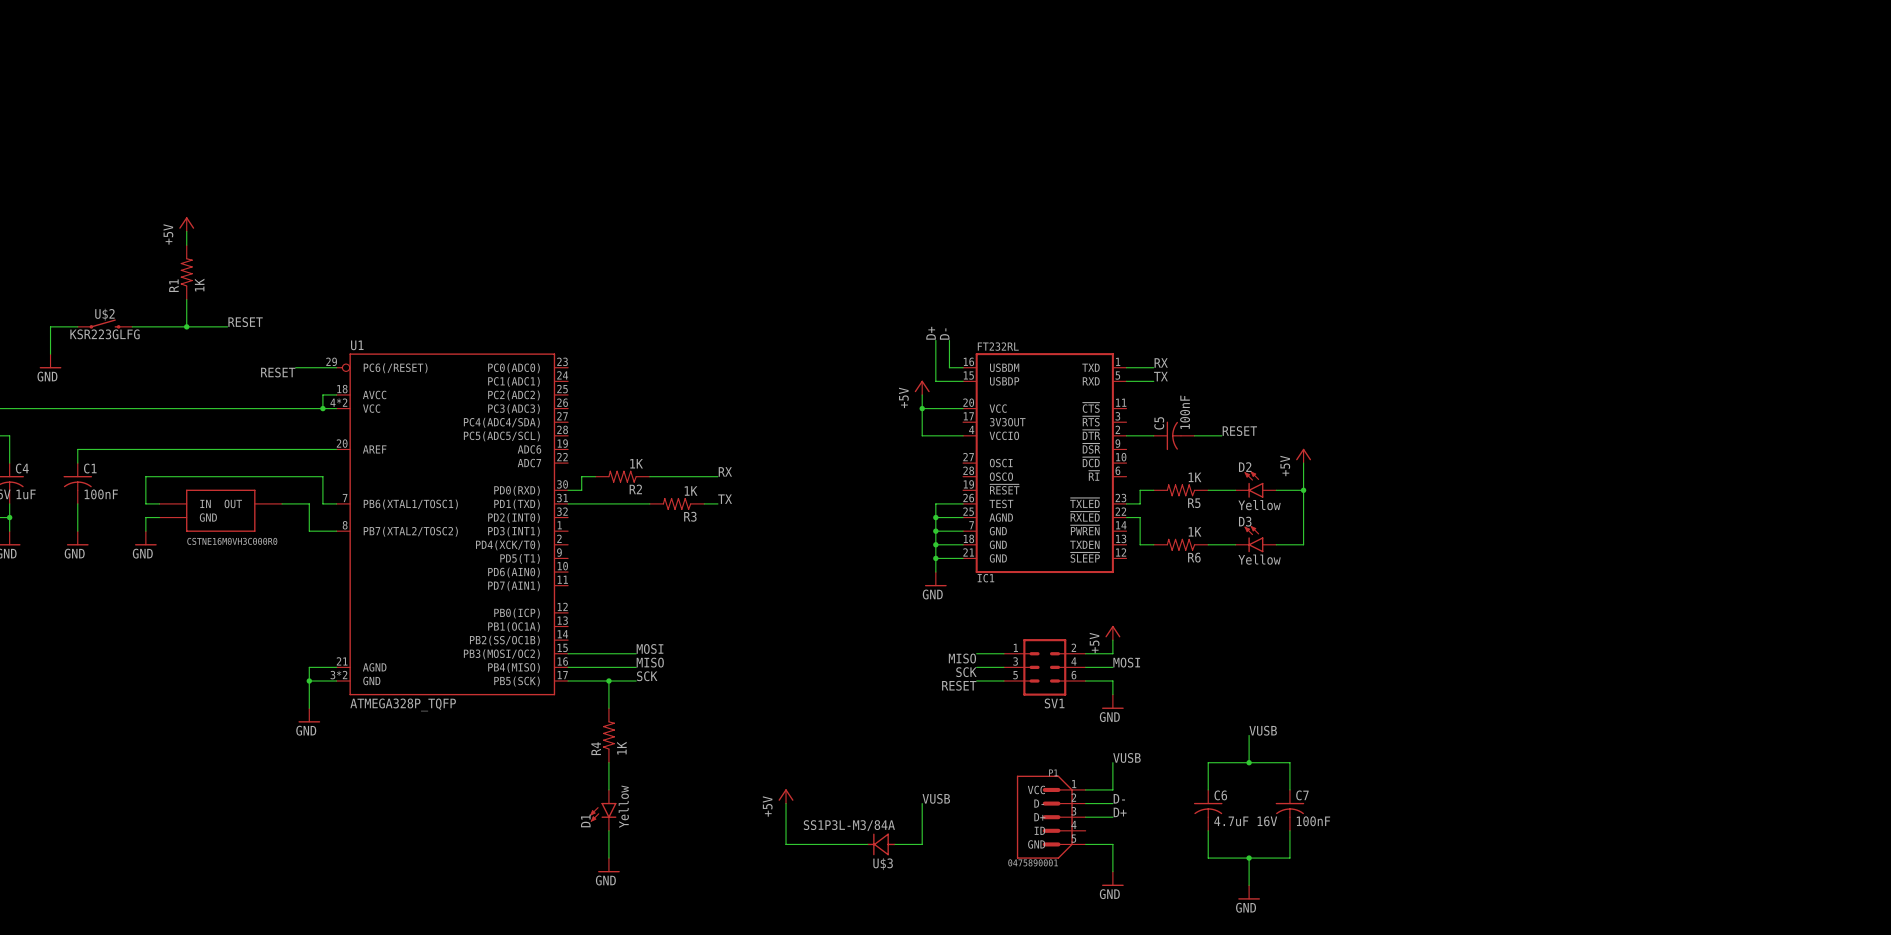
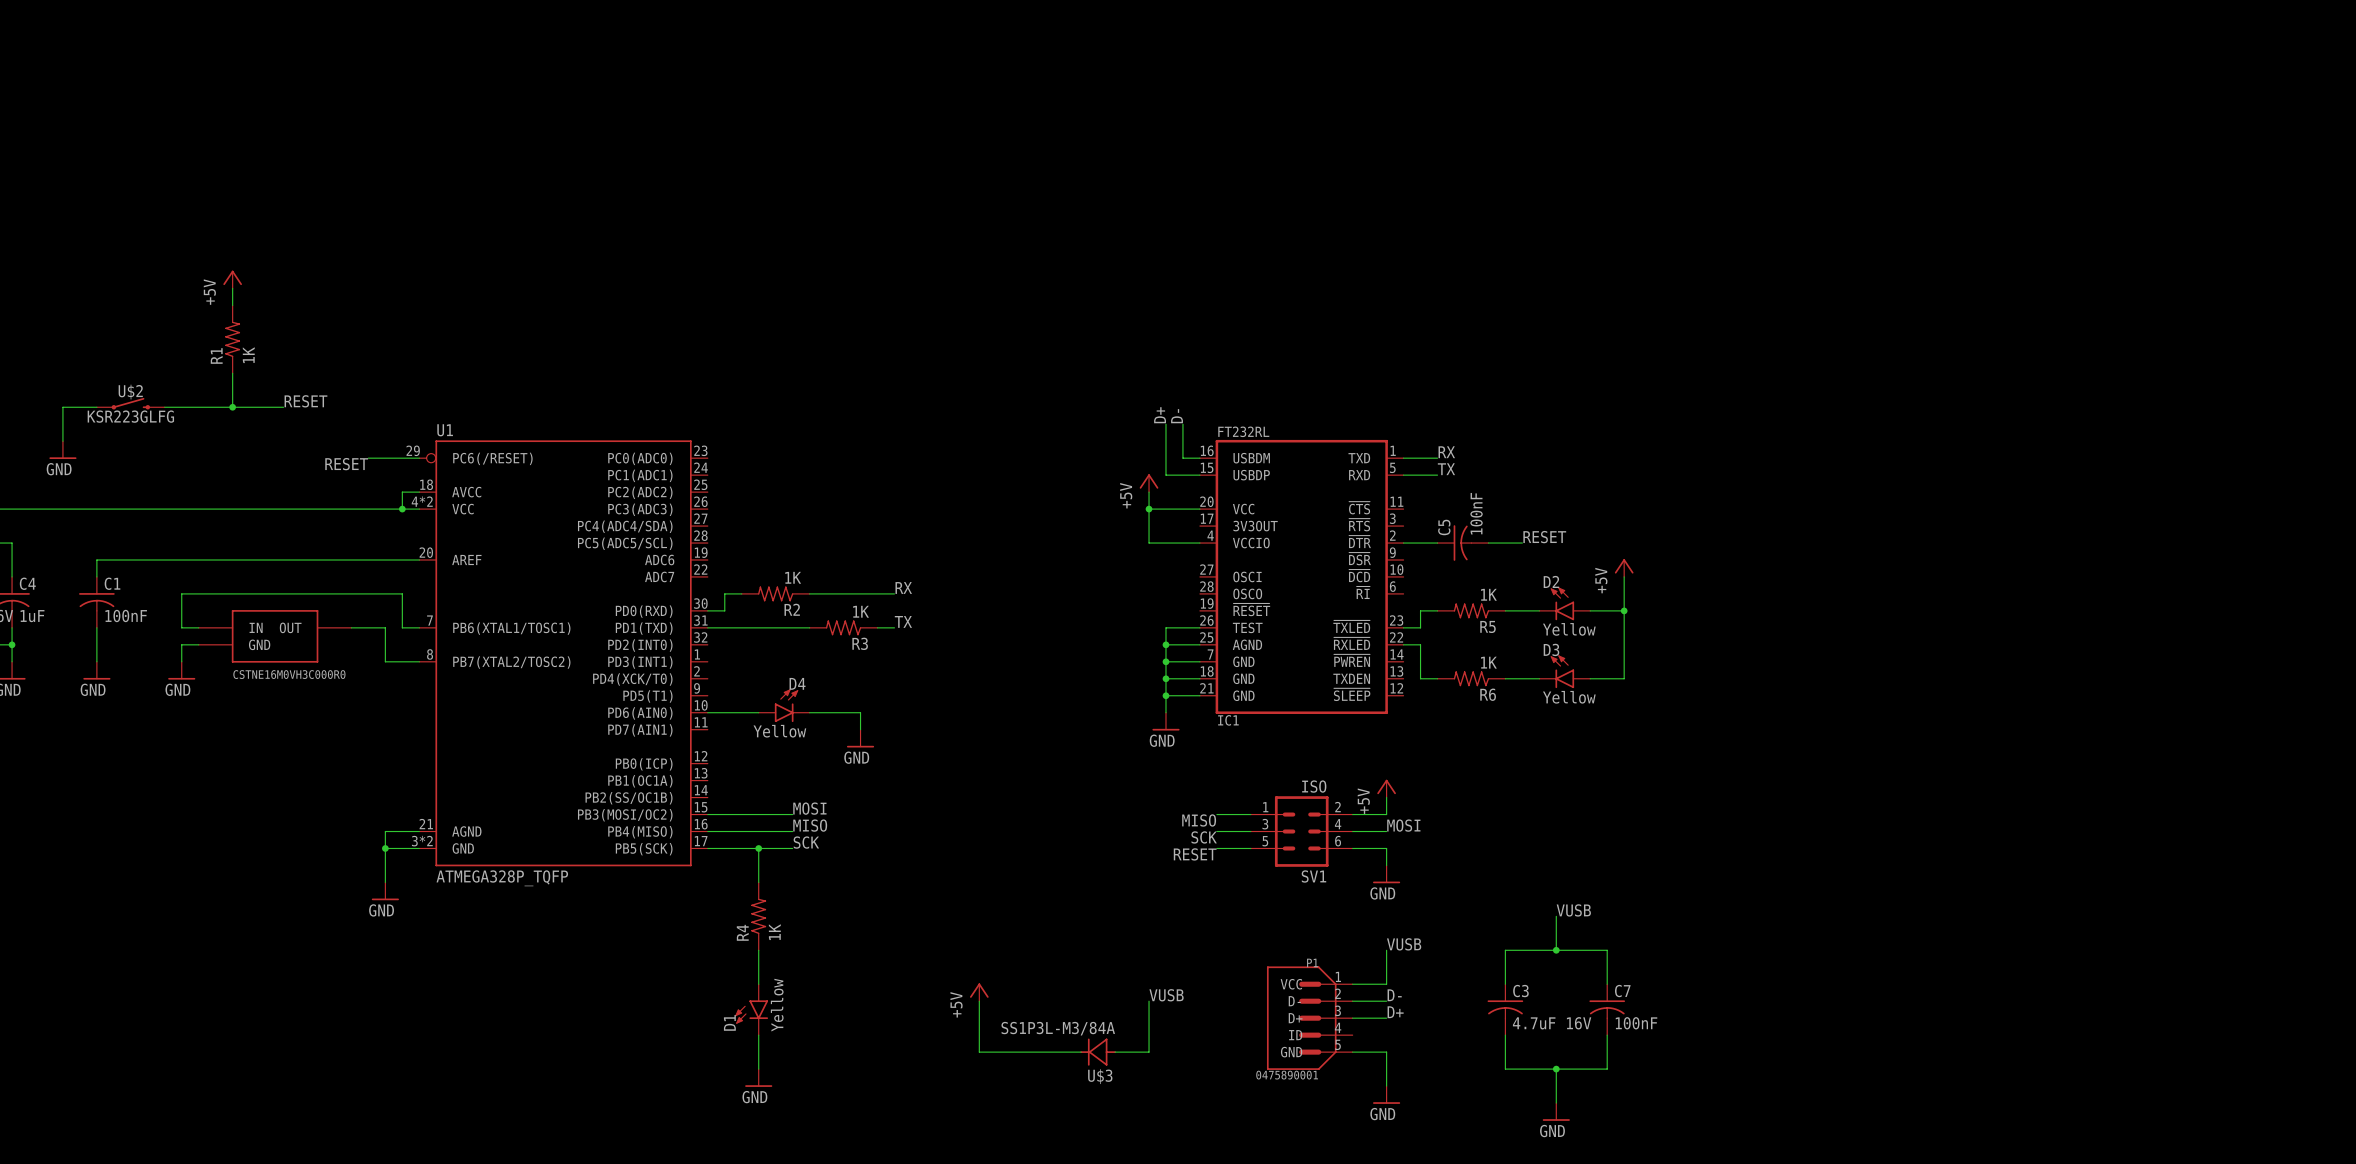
D4: none -> Yellow (784, 705)
wire: none -> (707, 712) (758, 712)
wire: none -> (809, 712) (860, 712) (860, 729)
power symbol: none -> GND (860, 738)
SV1 value: none -> ISO (1314, 786)
C6 name: C6 (1220, 795) -> C3 (1520, 991)

